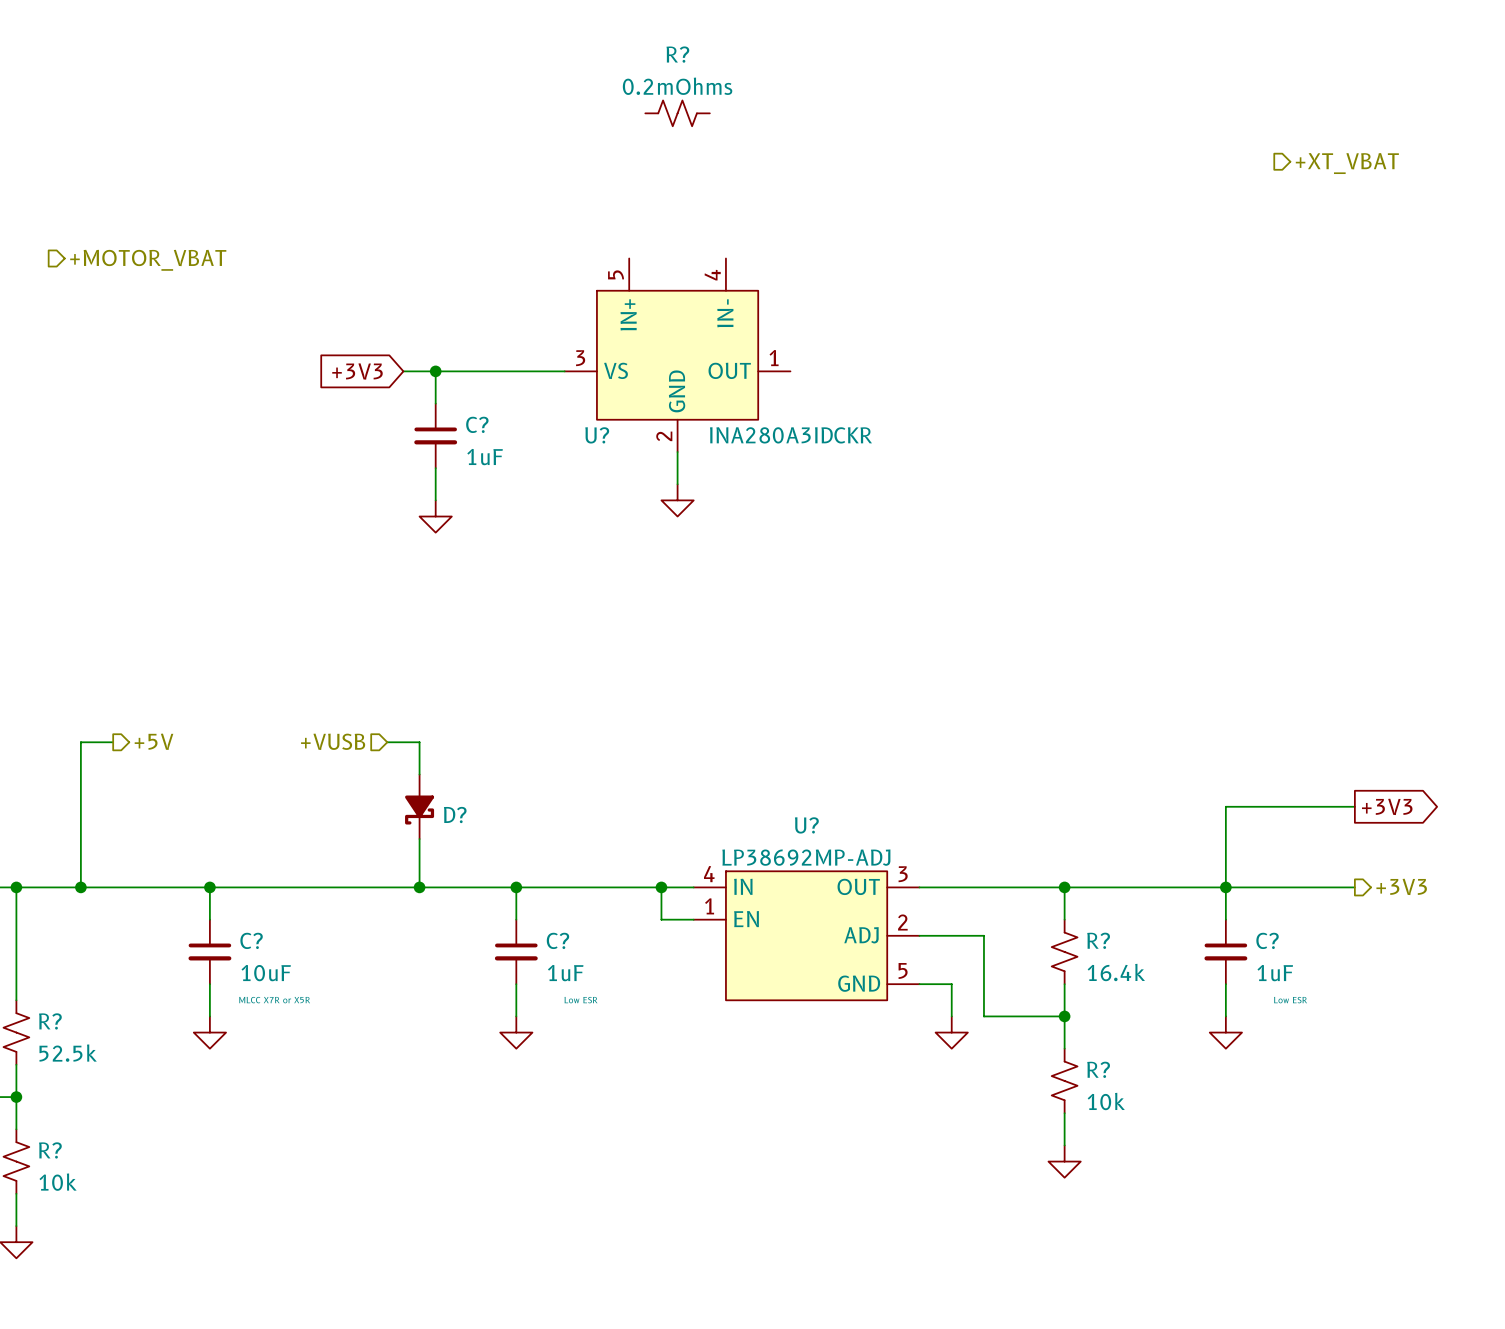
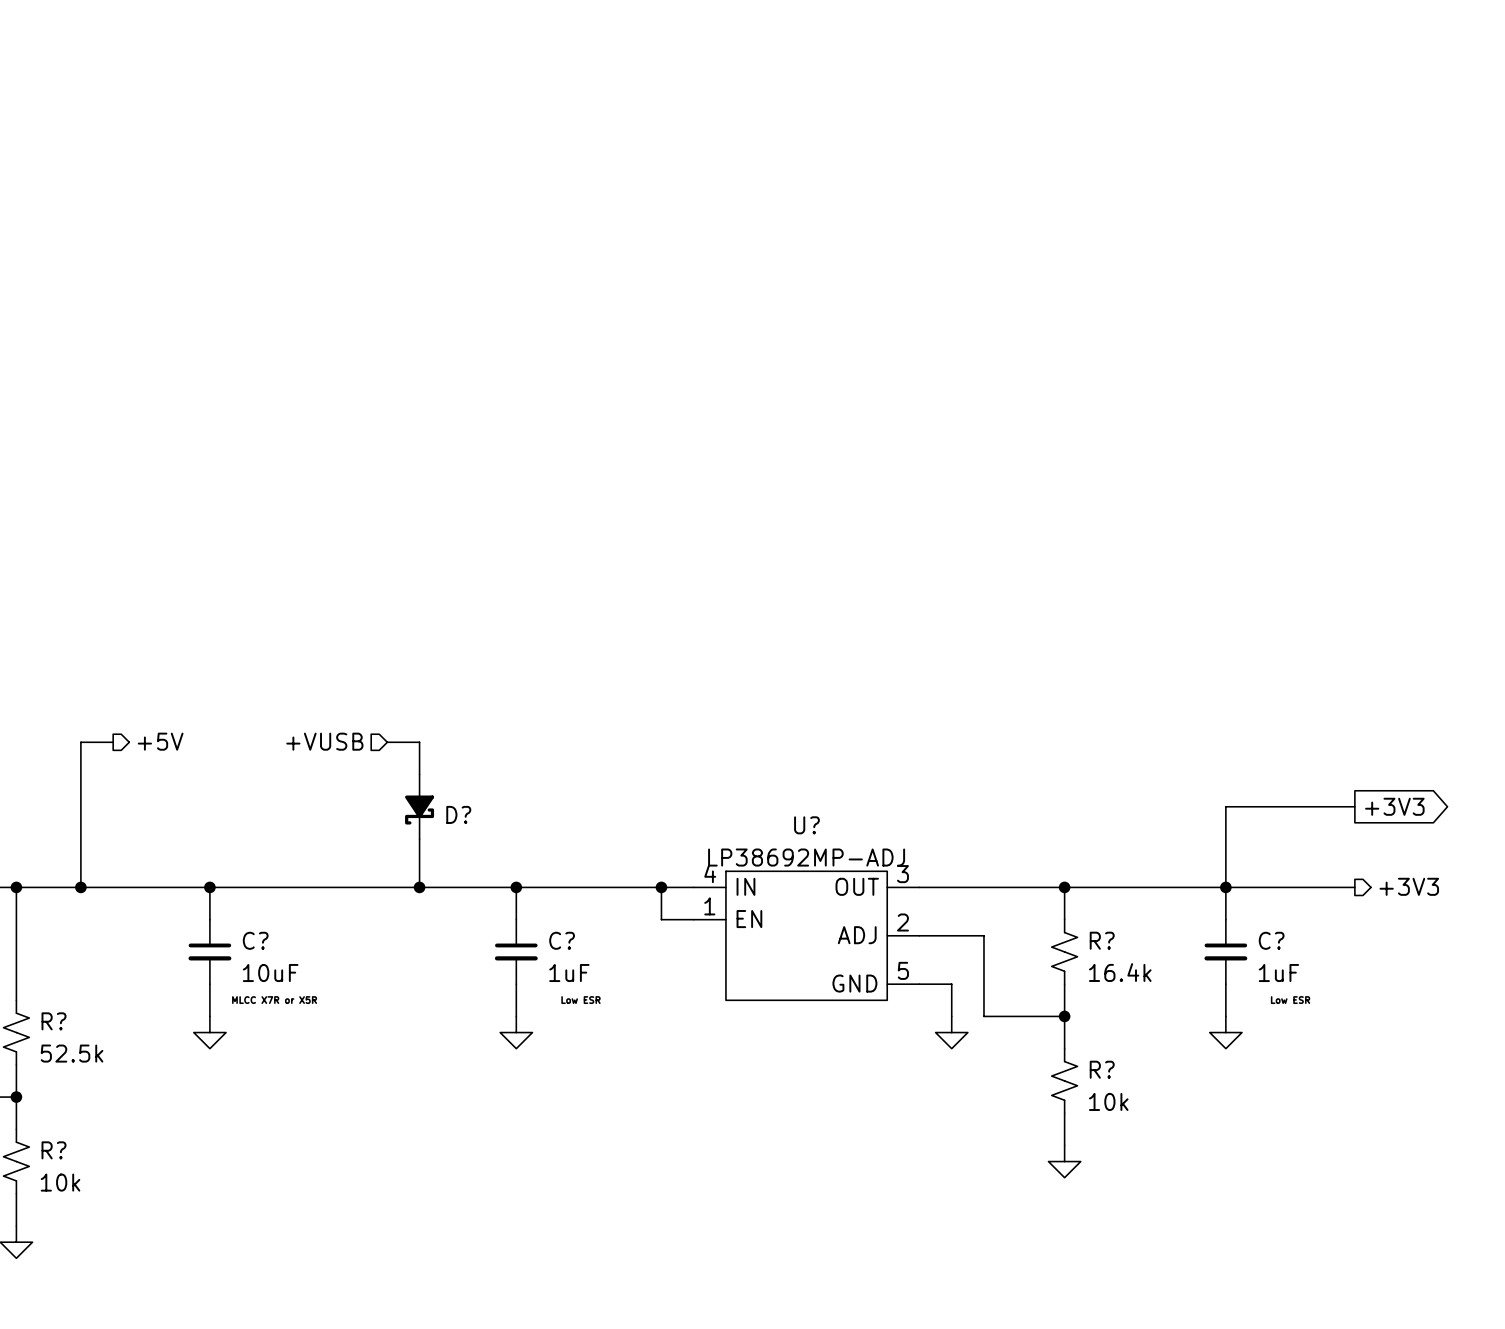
R?: 0.2mOhms (677, 113) -> none
hierarchical label: +XT_VBAT (1347, 163) -> none
hierarchical label: +MOTOR_VBAT (148, 260) -> none
U?: INA280A3IDCKR (677, 355) -> none
global label: +3V3 (357, 371) -> none
wire: (403, 371) (564, 371) -> none
wire: (435, 371) (435, 403) -> none
junction: (435, 371) -> none
C?: 1uF (435, 435) -> none
wire: (677, 452) (677, 484) -> none
wire: (435, 468) (435, 500) -> none
power symbol: (677, 500) -> none
power symbol: (435, 516) -> none

